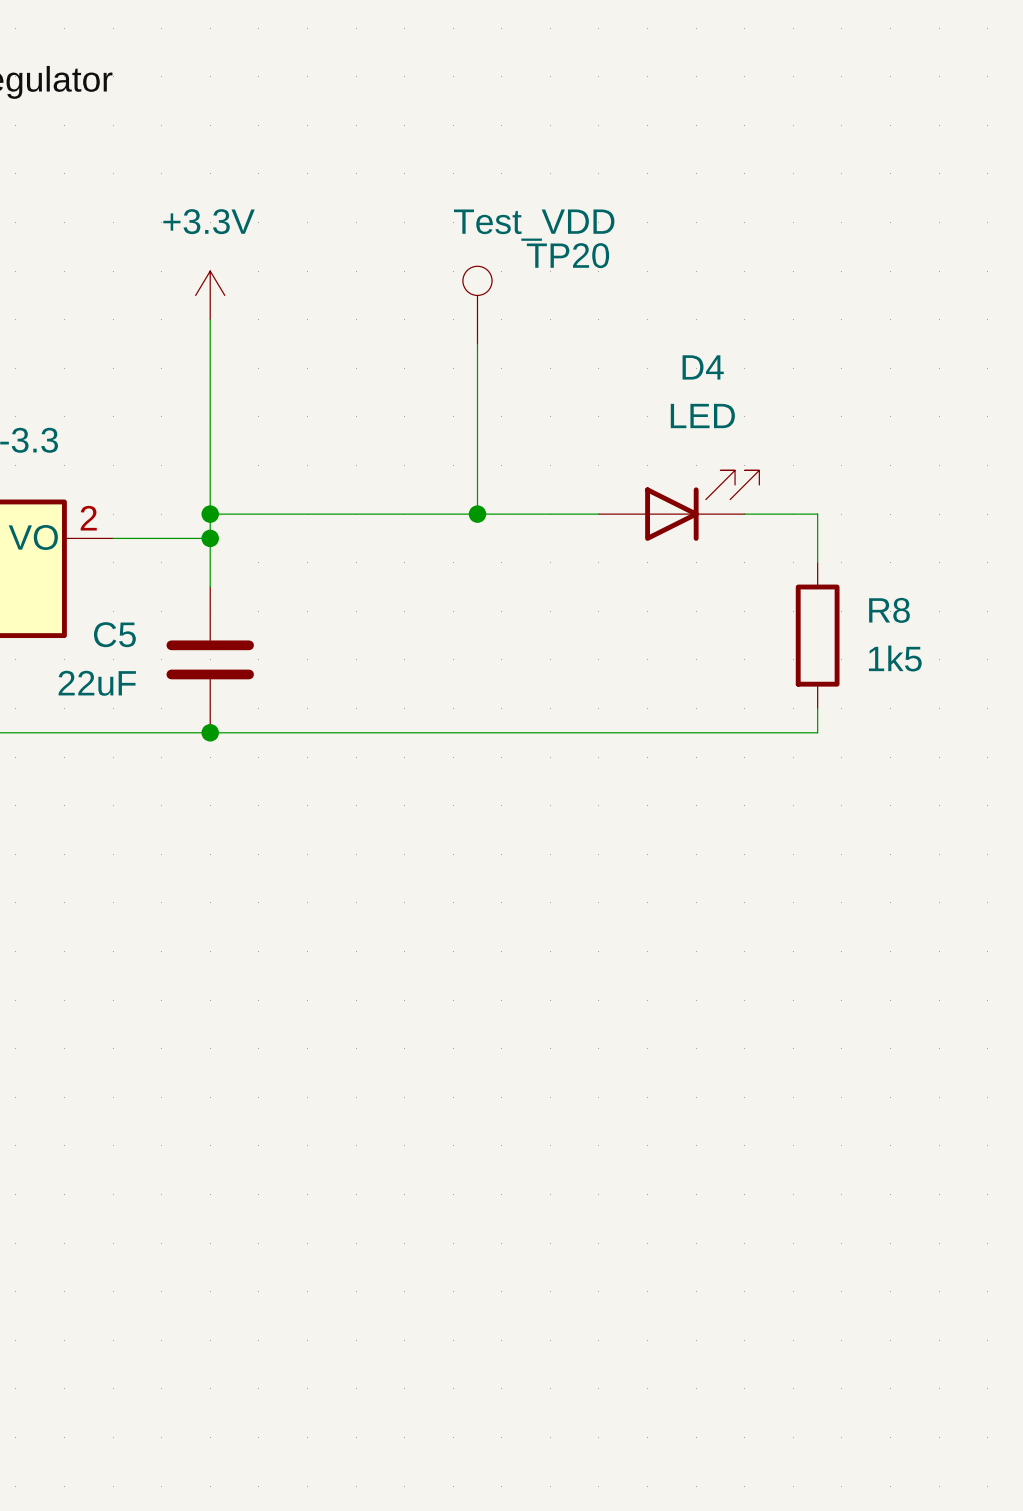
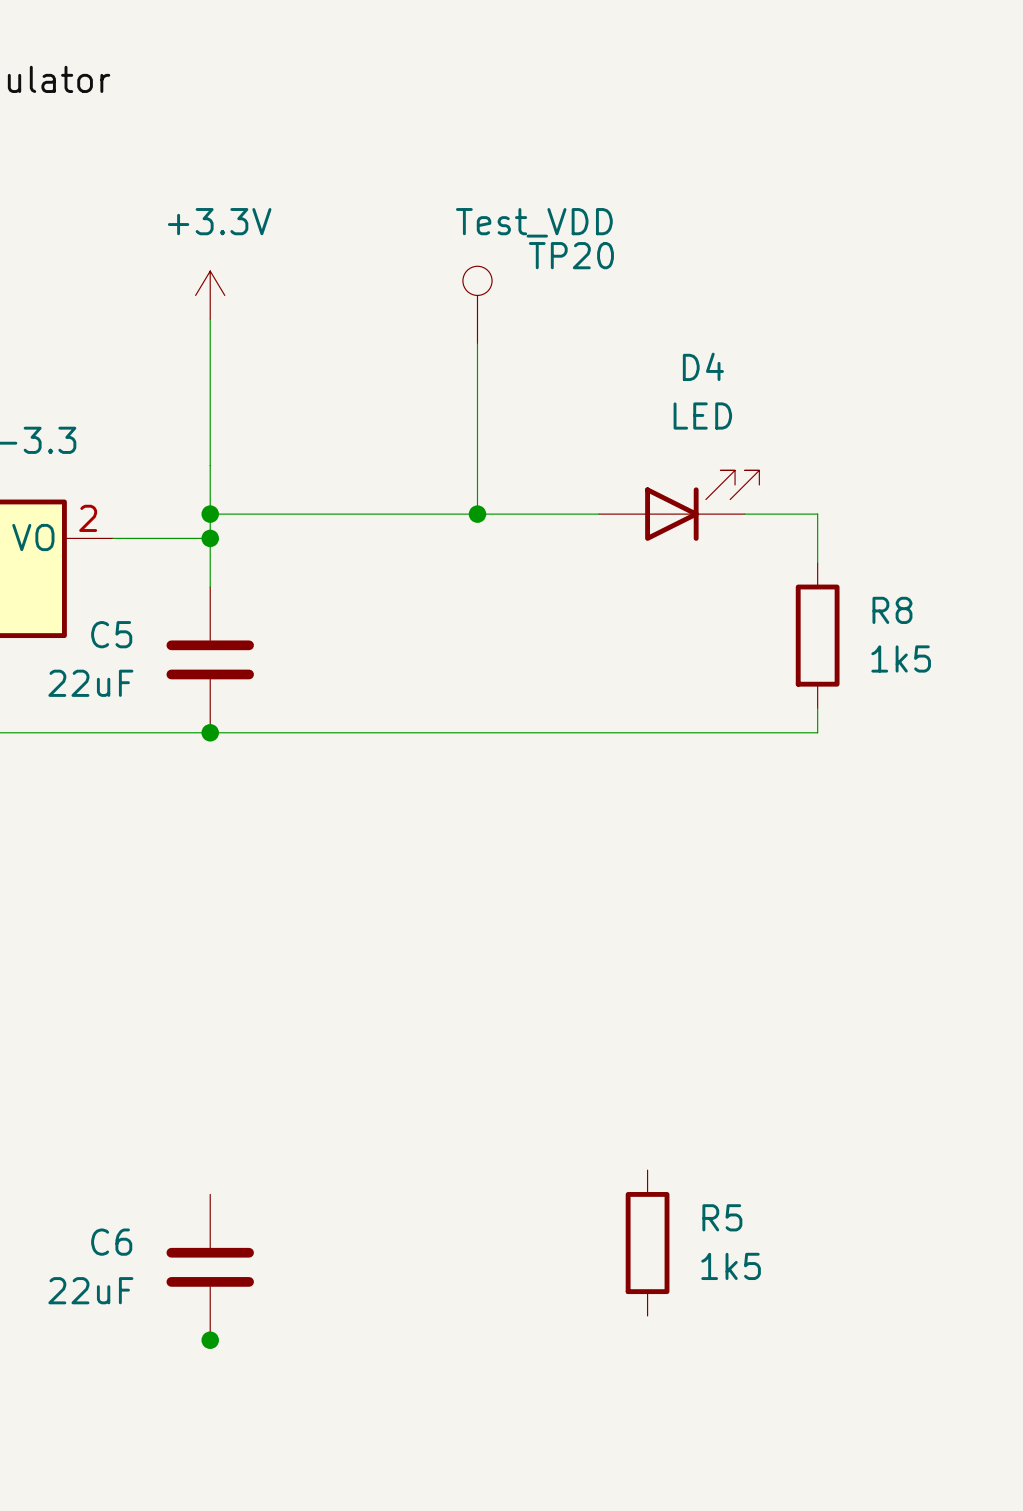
R5: none -> 1k5 (647, 1243)
C6: none -> 22uF (210, 1267)
junction: none -> (210, 1340)

